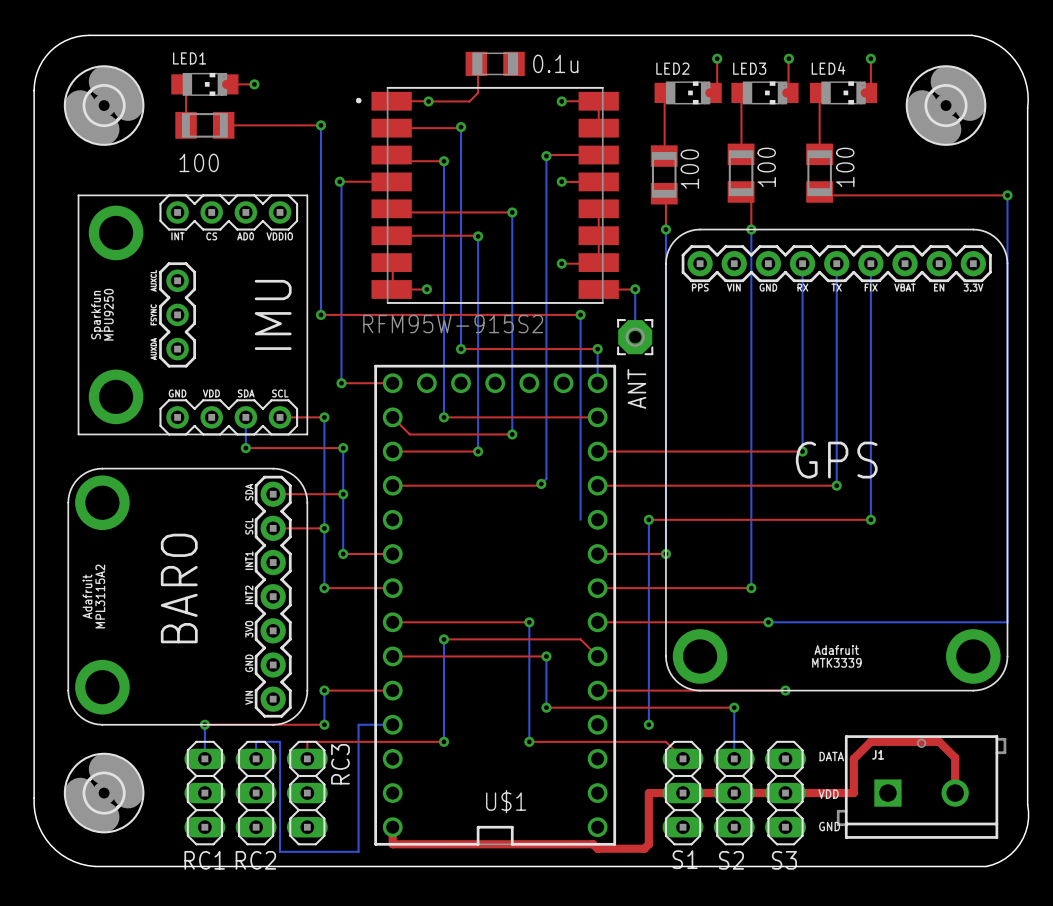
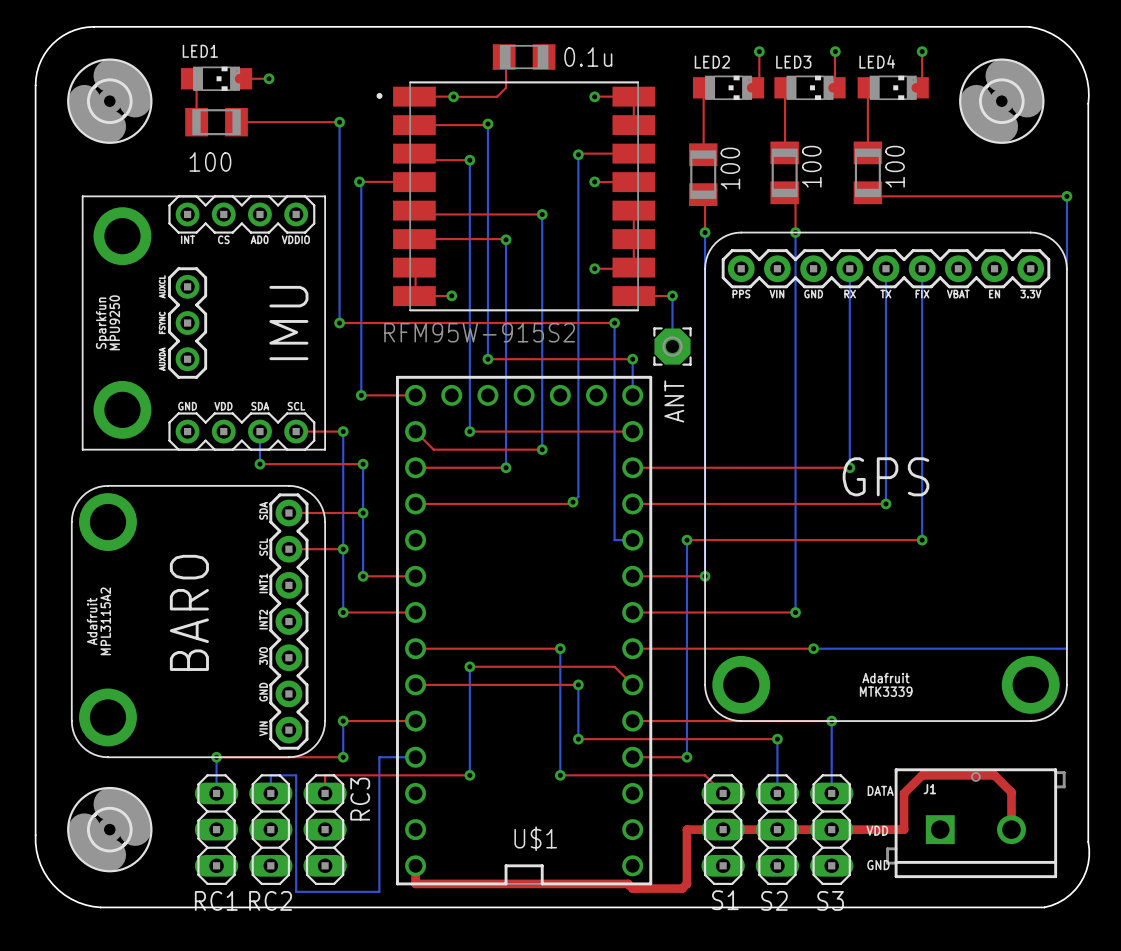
bottom track: none -> (614, 540) (632, 540)
bottom track: none -> (831, 721) (831, 793)
top track: none -> (632, 757) (686, 757)

